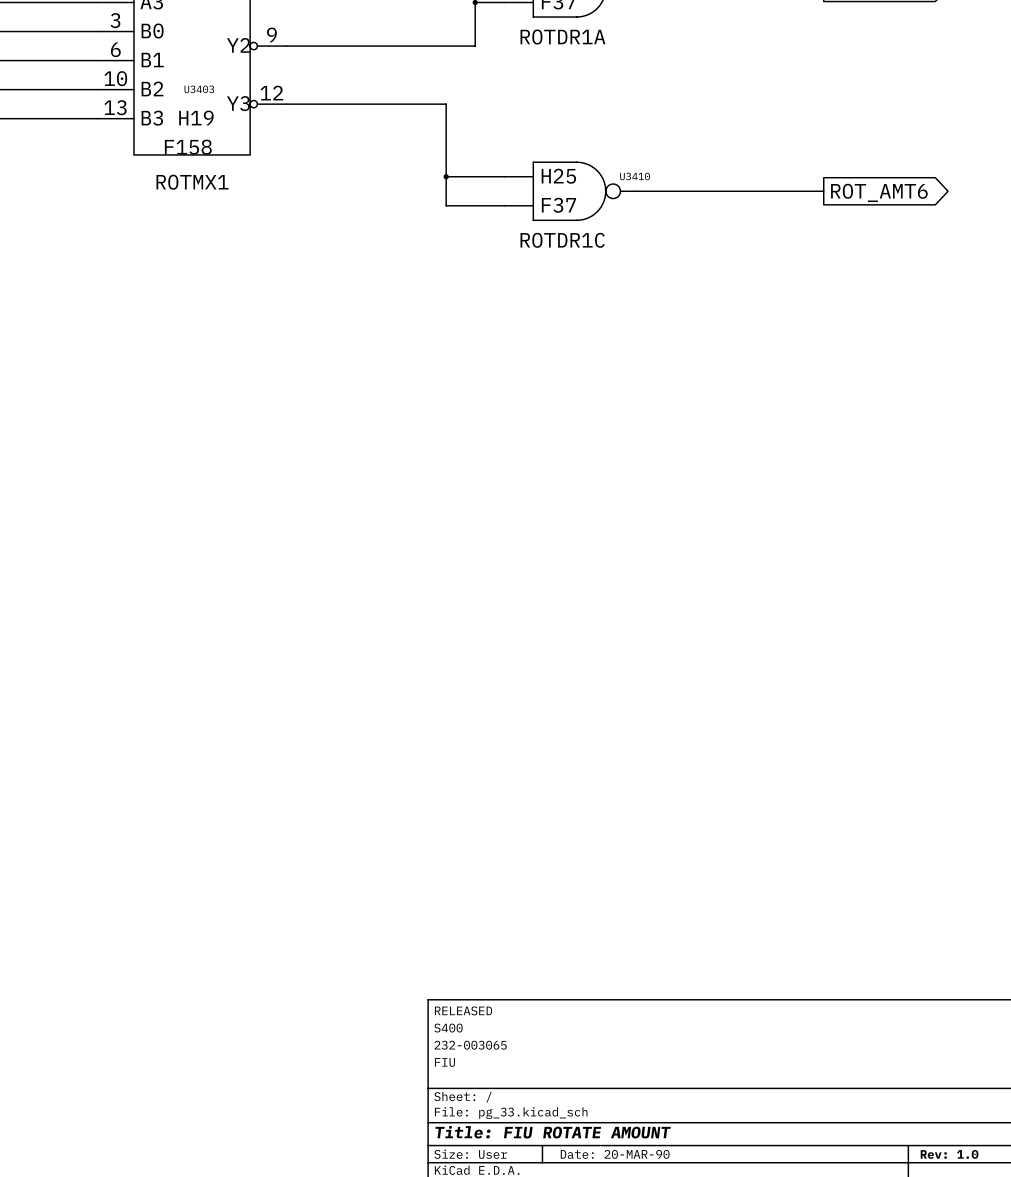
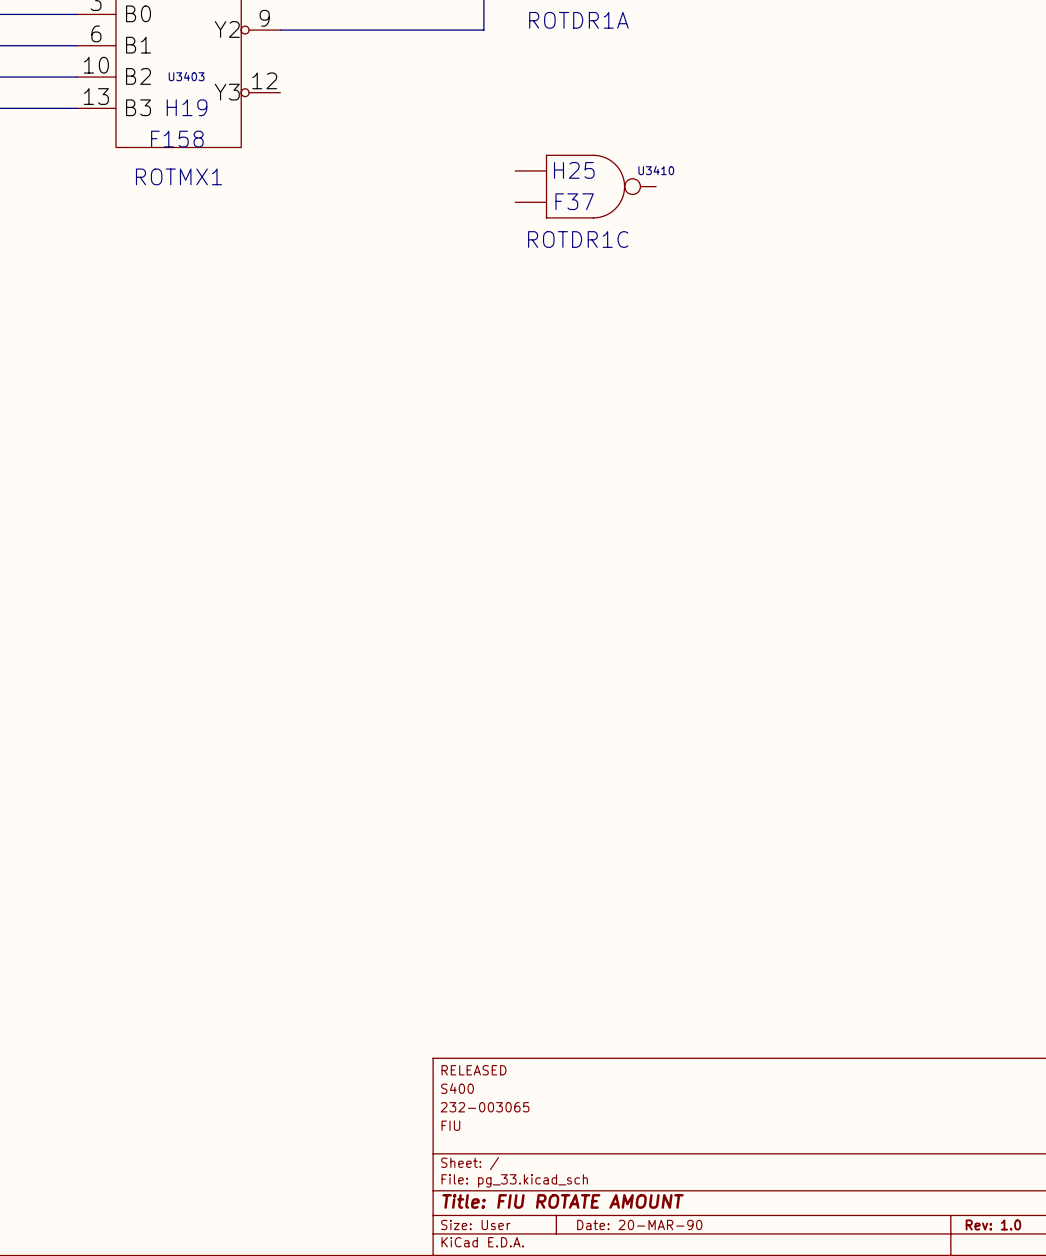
wire: (286, 104) (446, 104) (446, 205) (504, 205) -> none
wire: (446, 176) (504, 176) -> none
junction: (446, 176) -> none
wire: (634, 191) (823, 191) -> none
global label: ROT_AMT6 (879, 192) -> none

